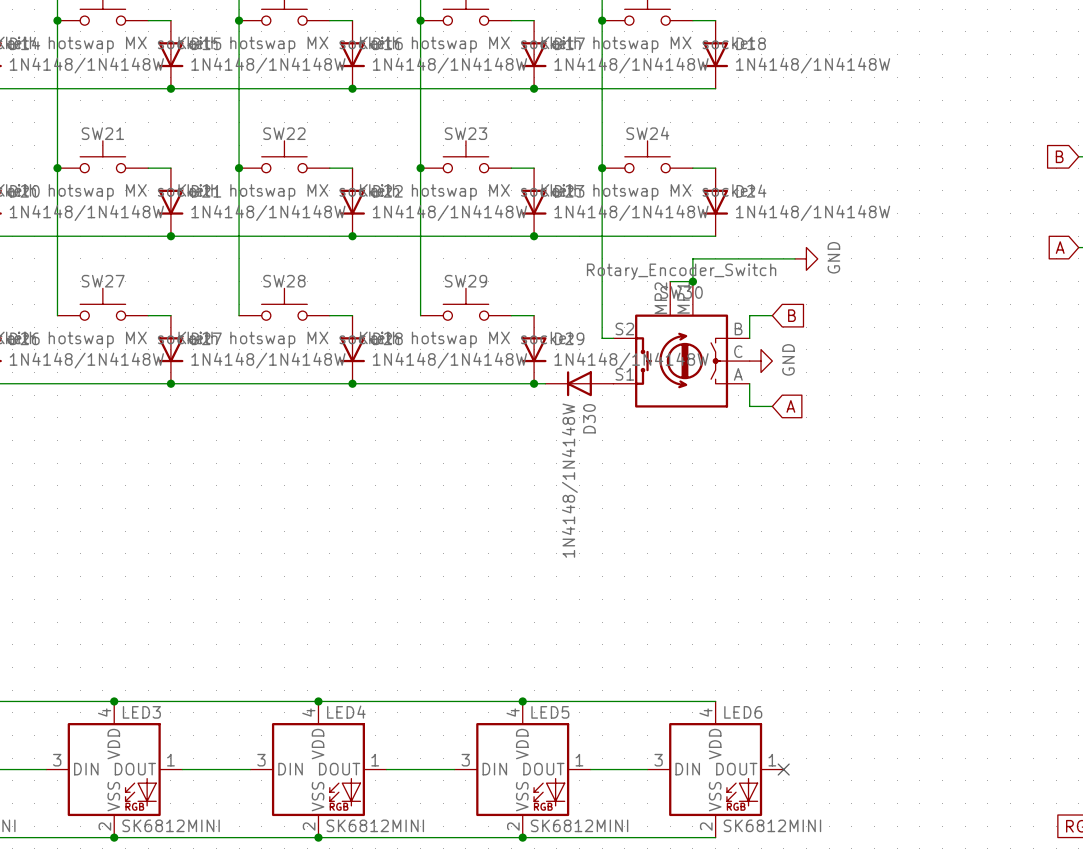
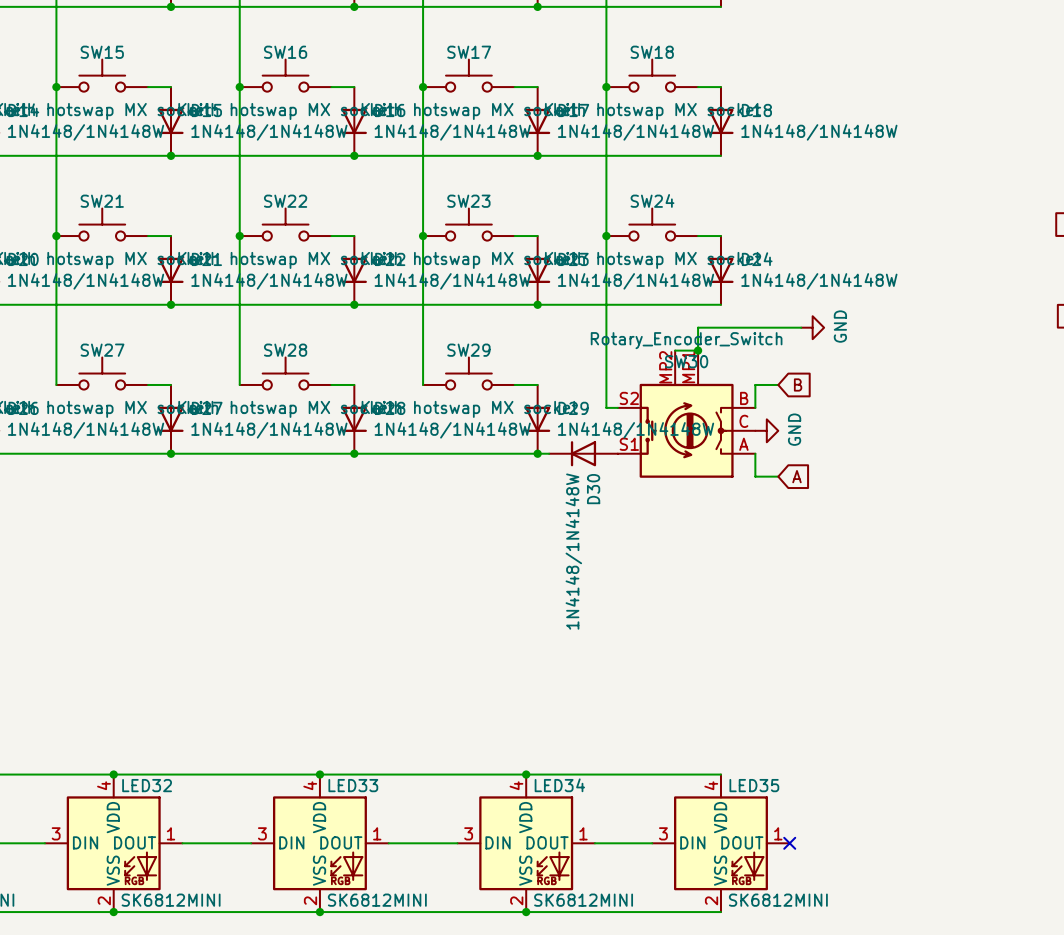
LED3 name: LED3 (141, 712) -> LED32 (147, 785)
LED4 name: LED4 (346, 712) -> LED33 (353, 785)
LED5 name: LED5 (550, 712) -> LED34 (559, 785)
LED6 name: LED6 (743, 712) -> LED35 (754, 785)

